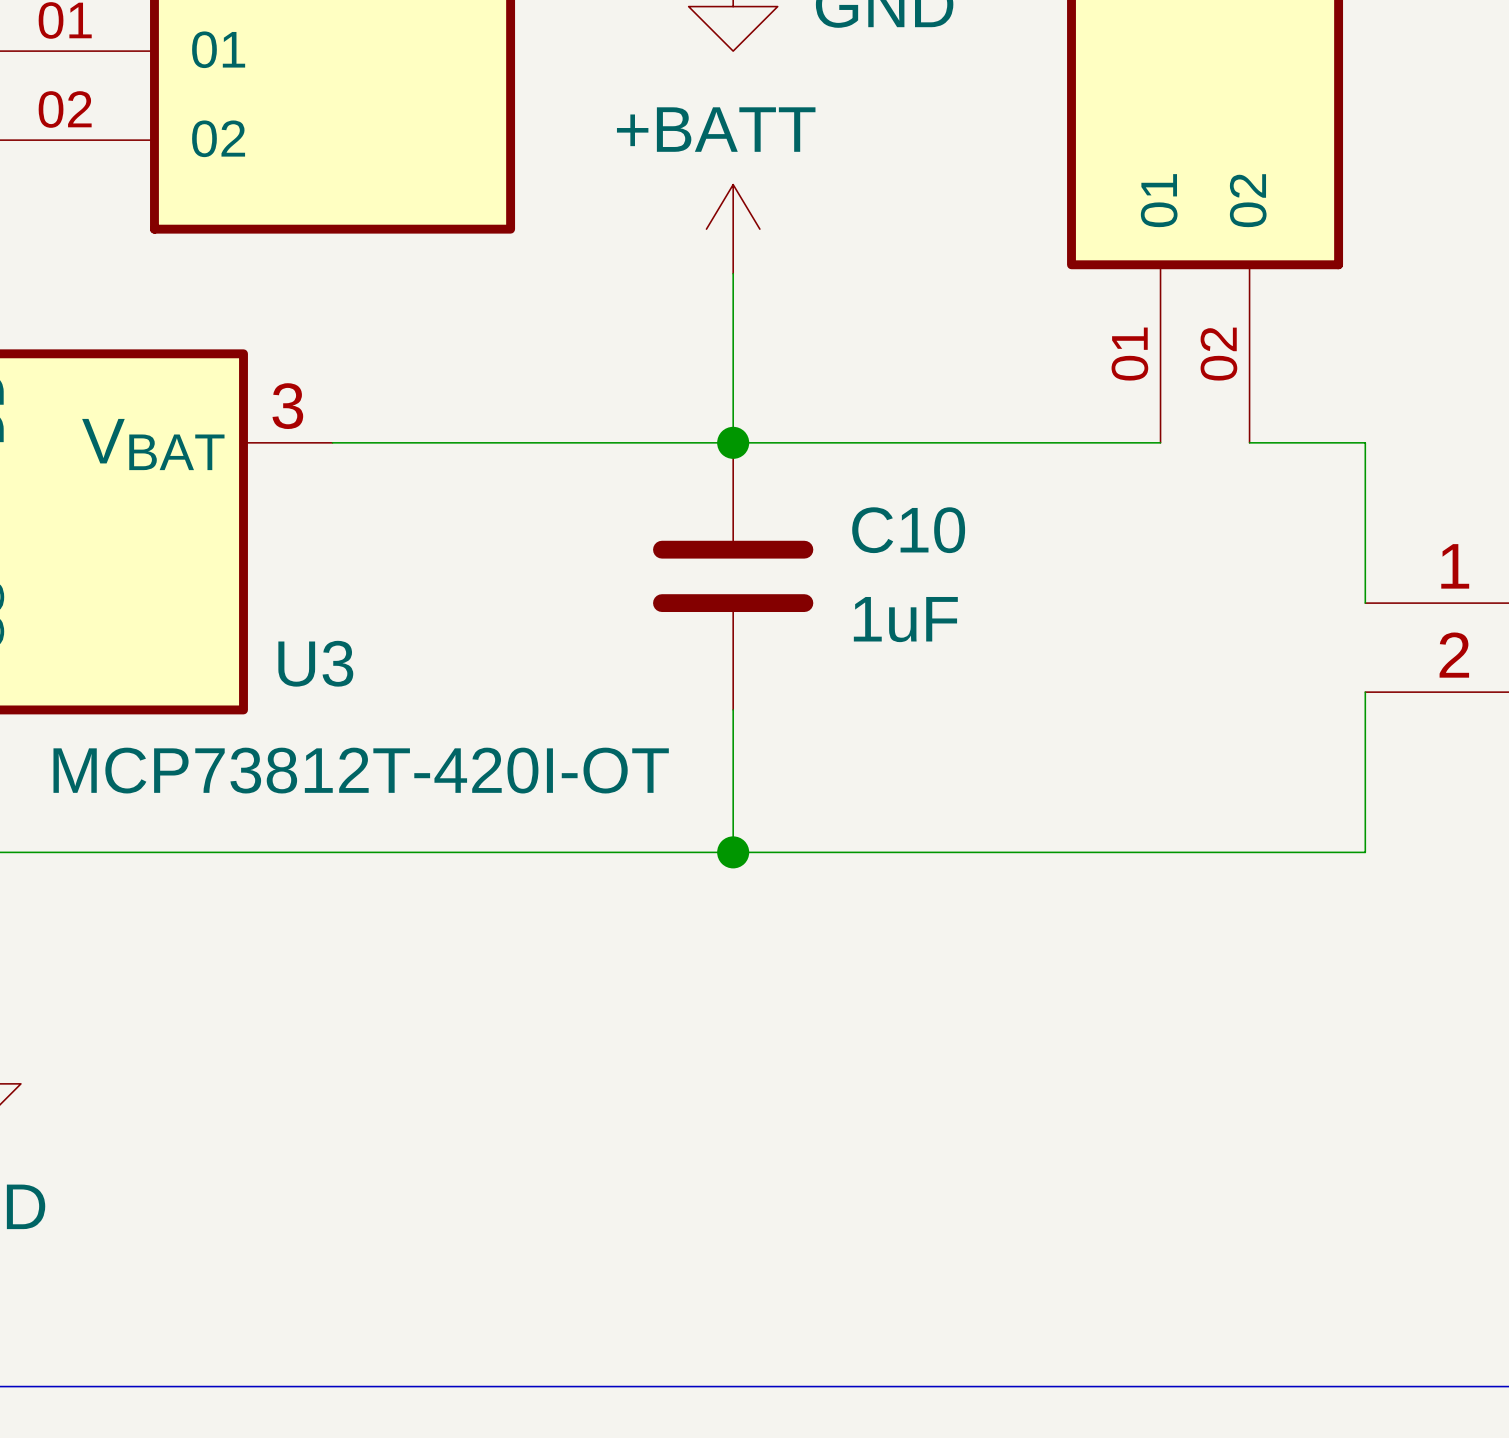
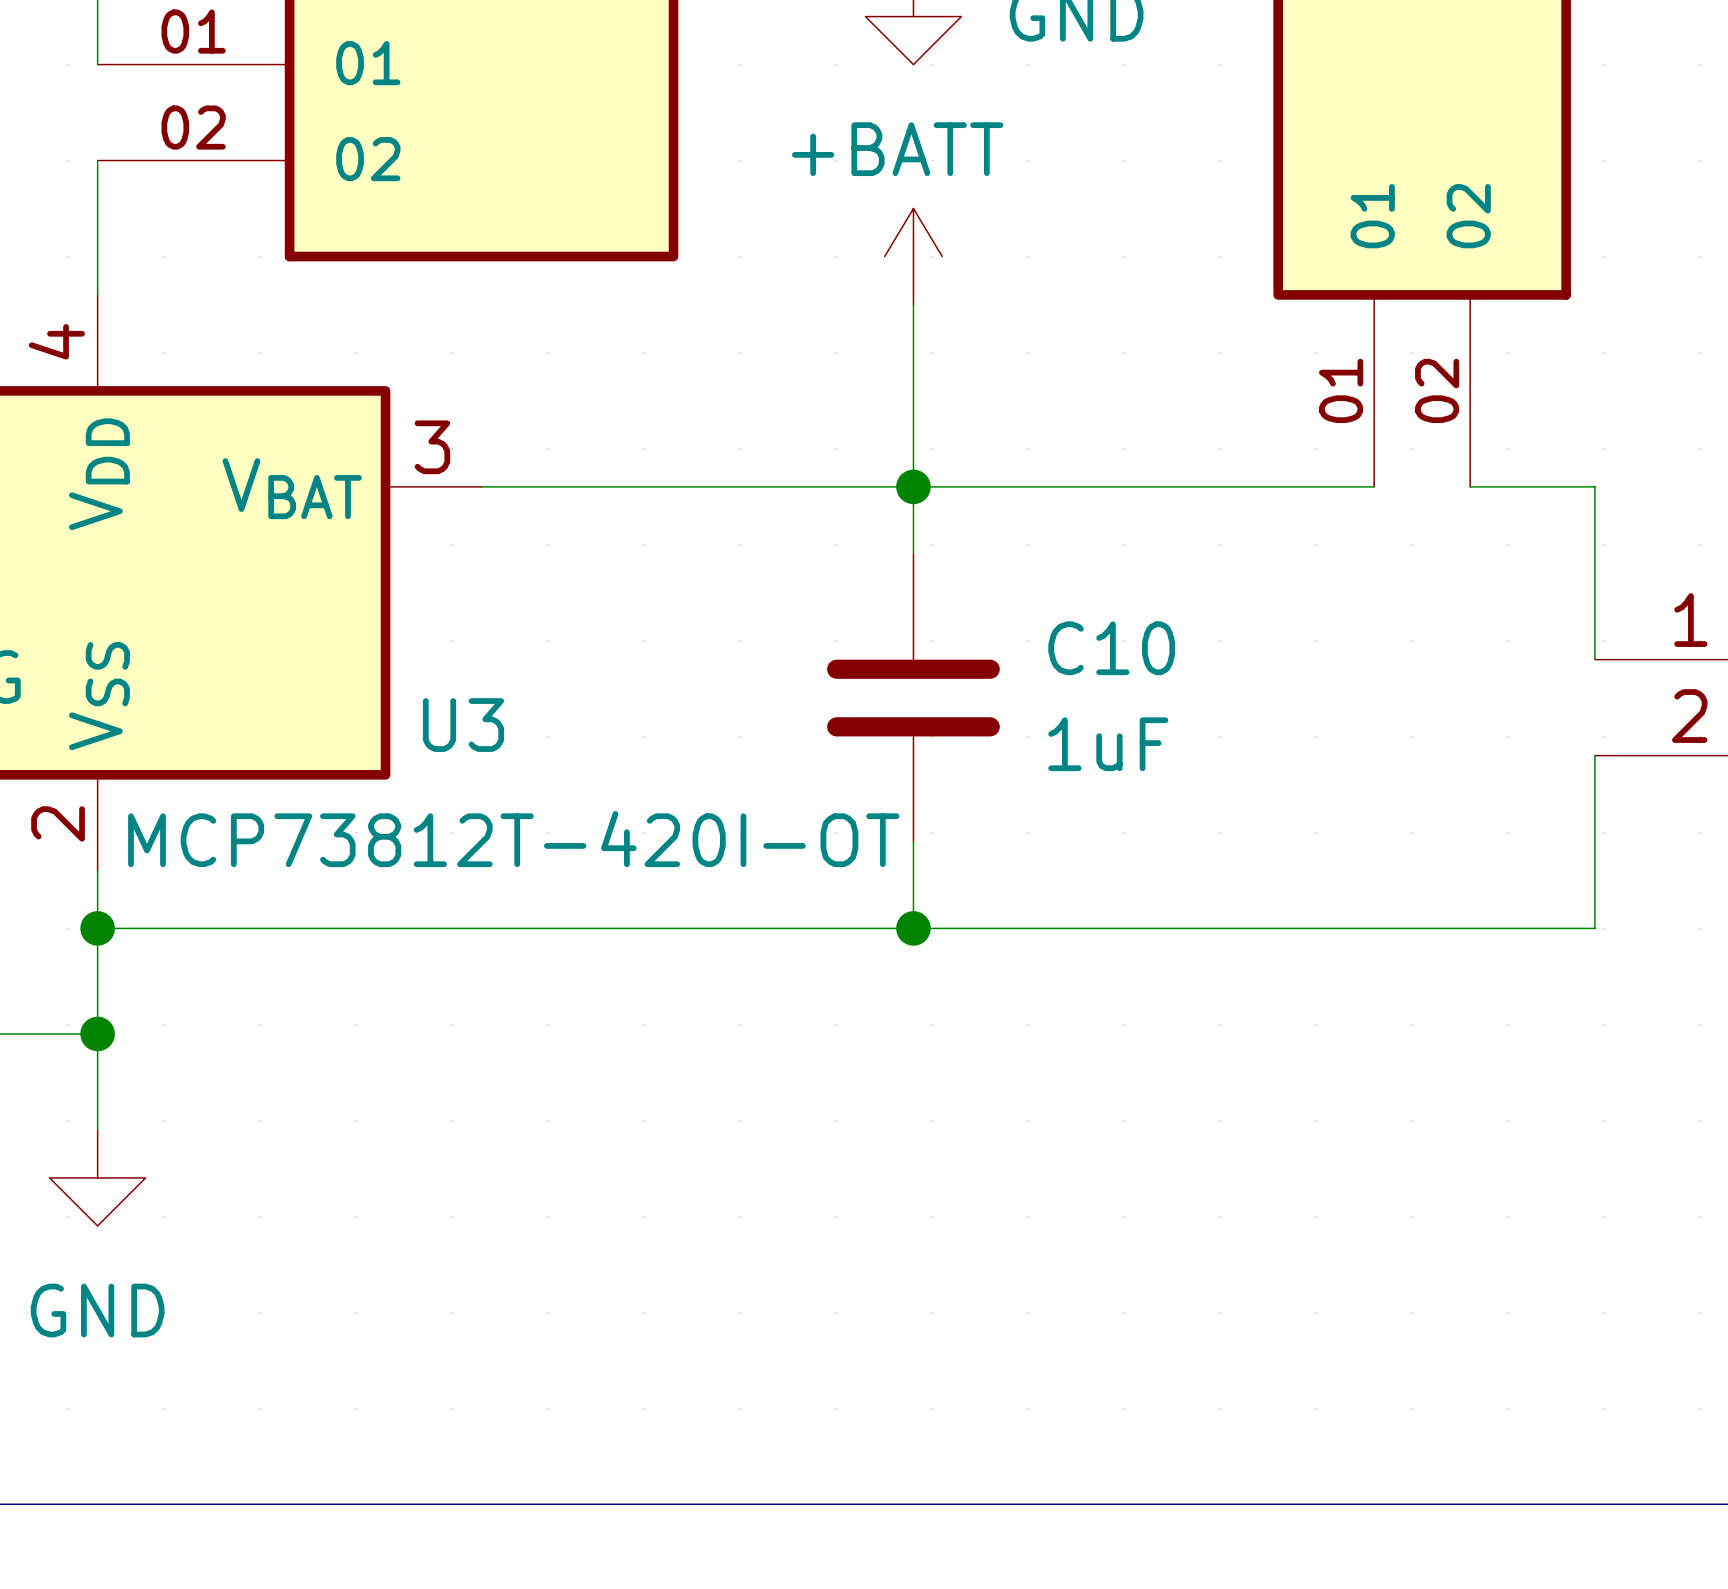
C10 position: (733, 576) -> (913, 698)

